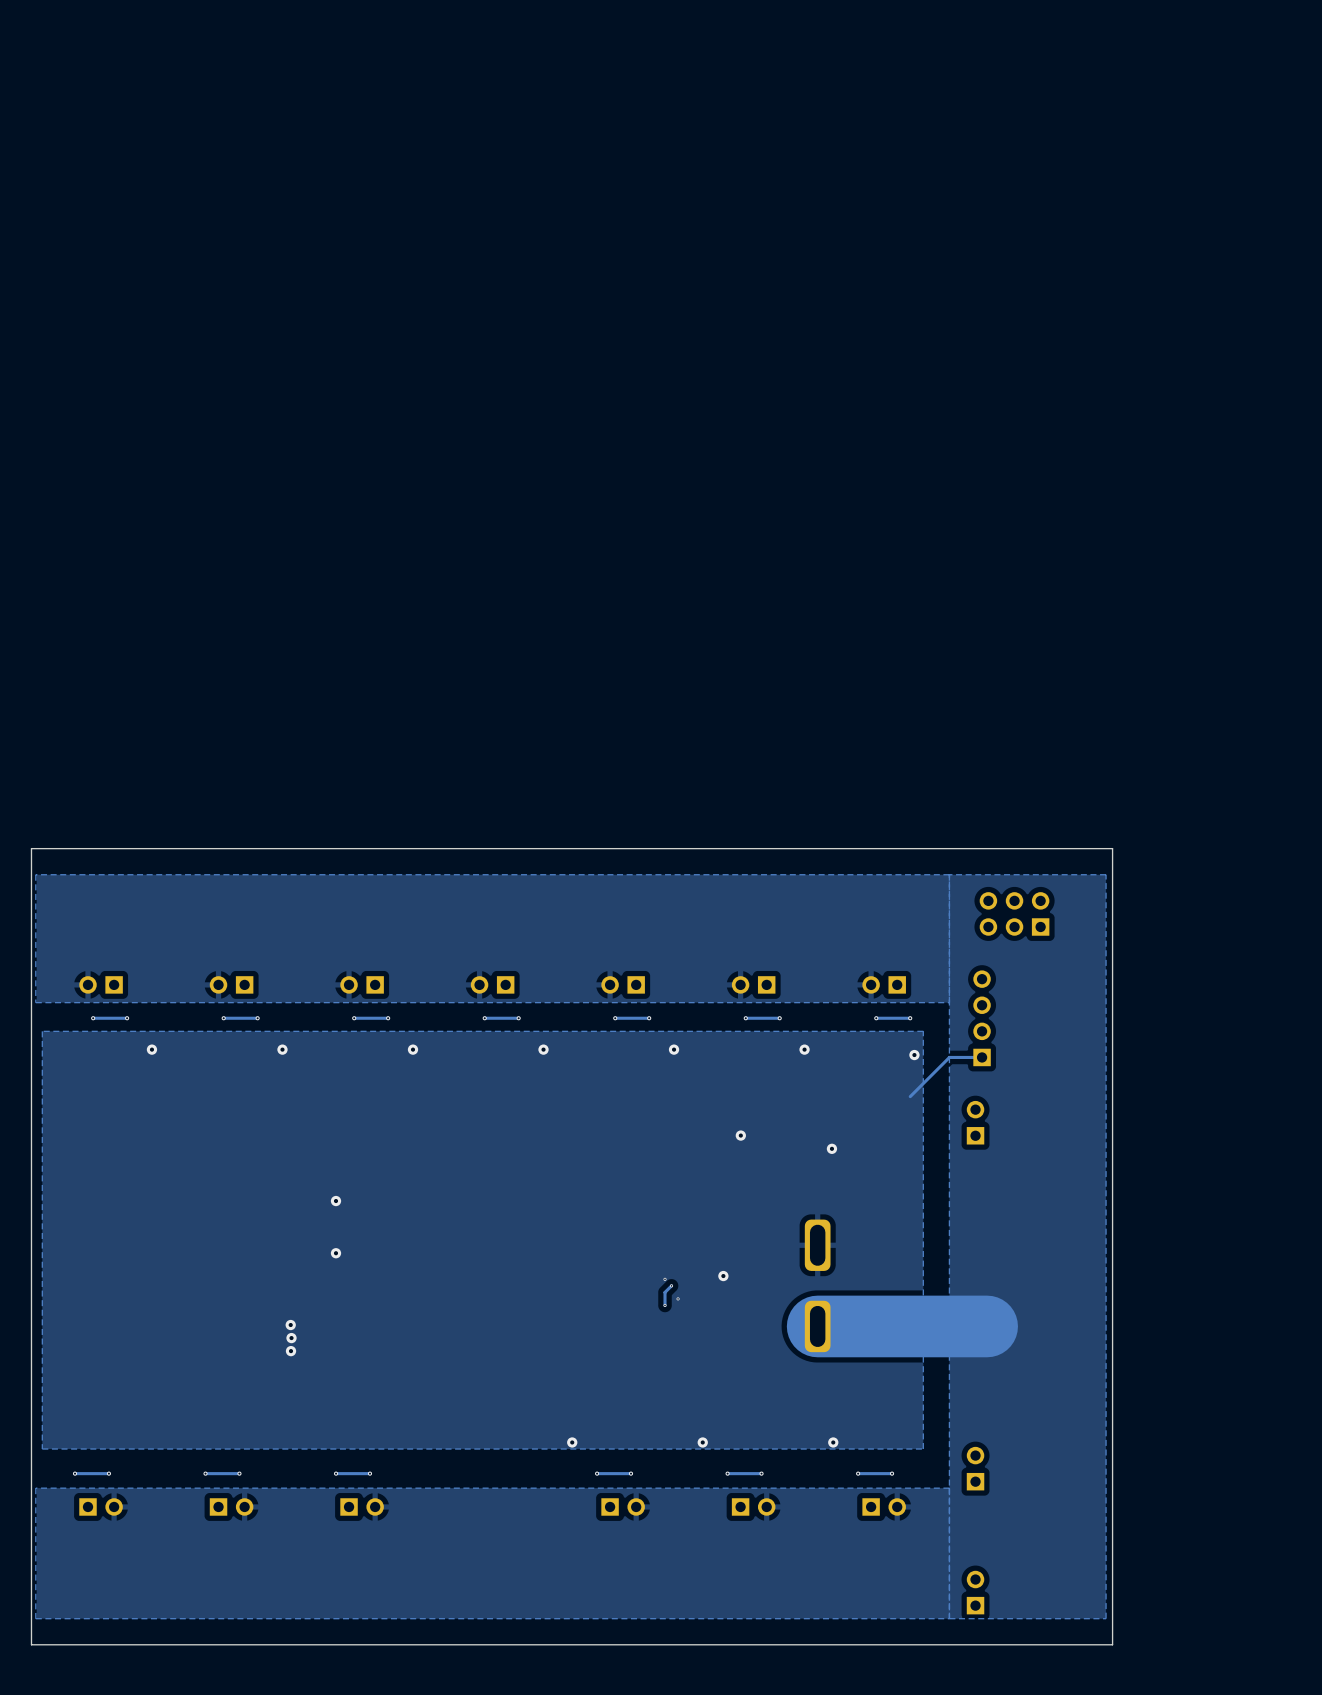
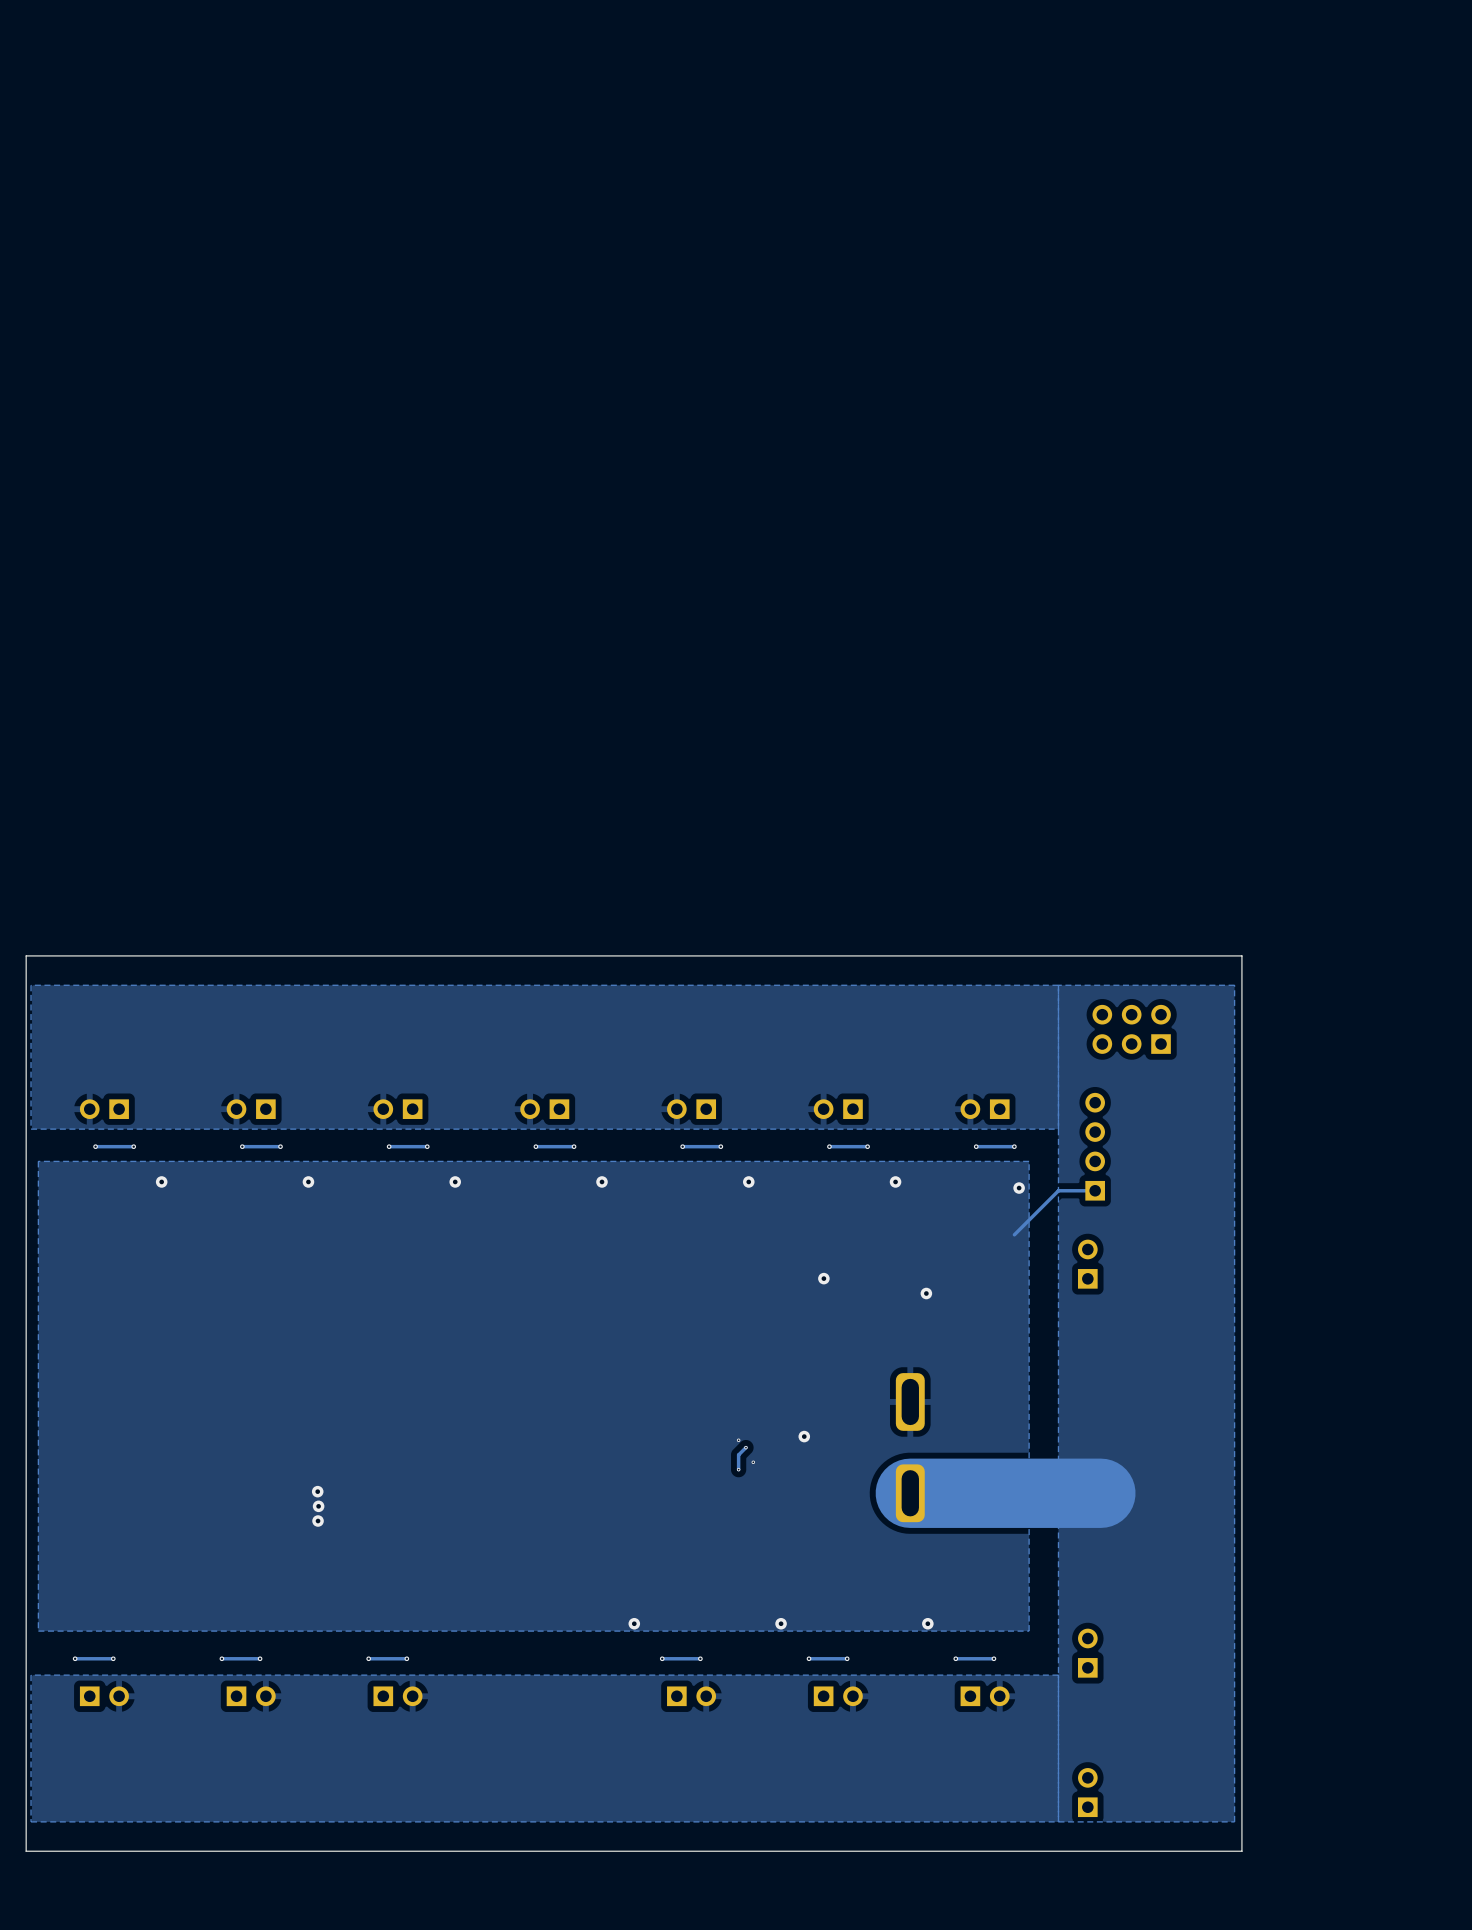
via: (335, 1201) -> none
via: (335, 1253) -> none

